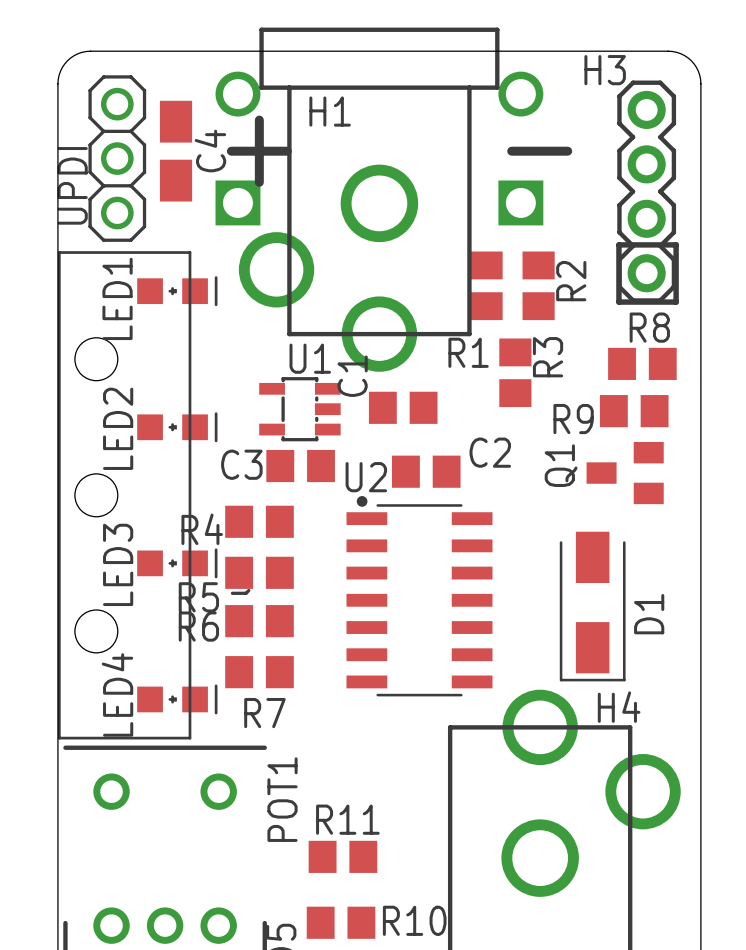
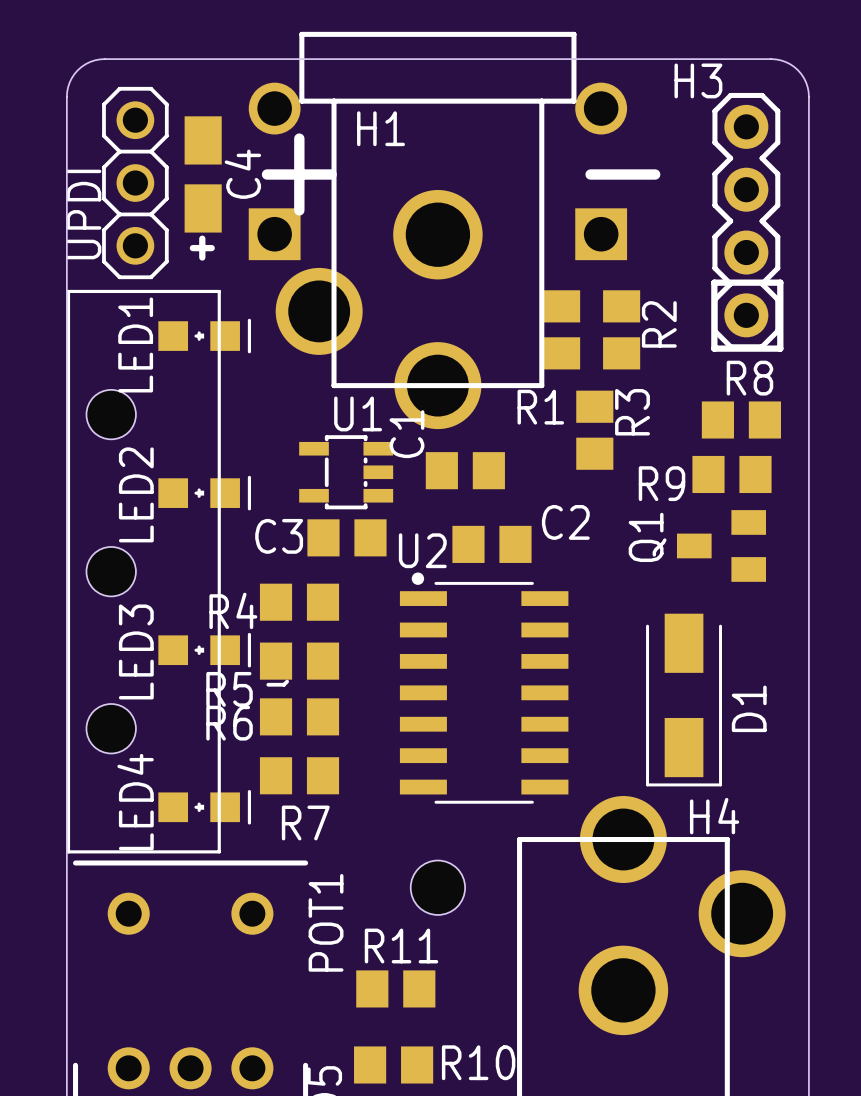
line: none -> (202, 238) (202, 257)
line: none -> (192, 248) (211, 248)
hole: none -> (437, 887)

